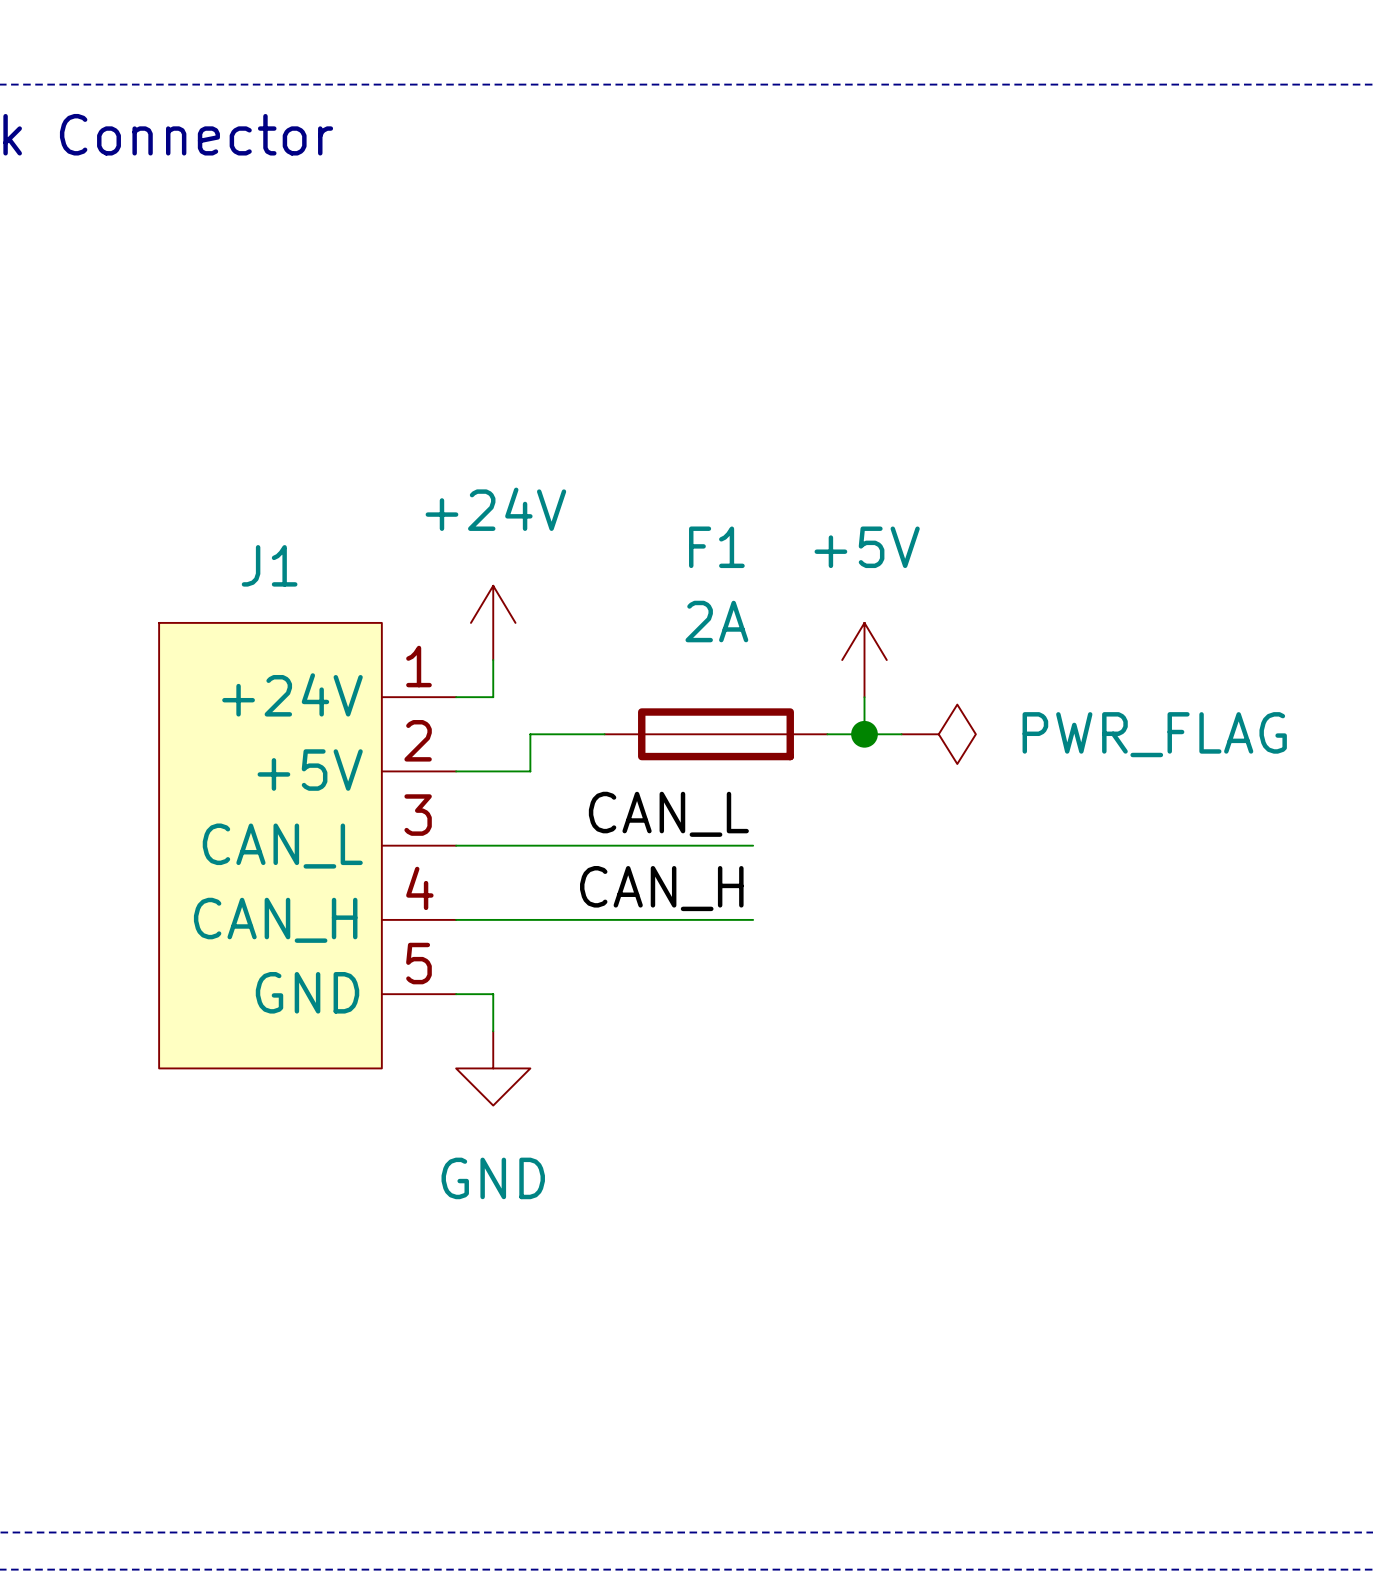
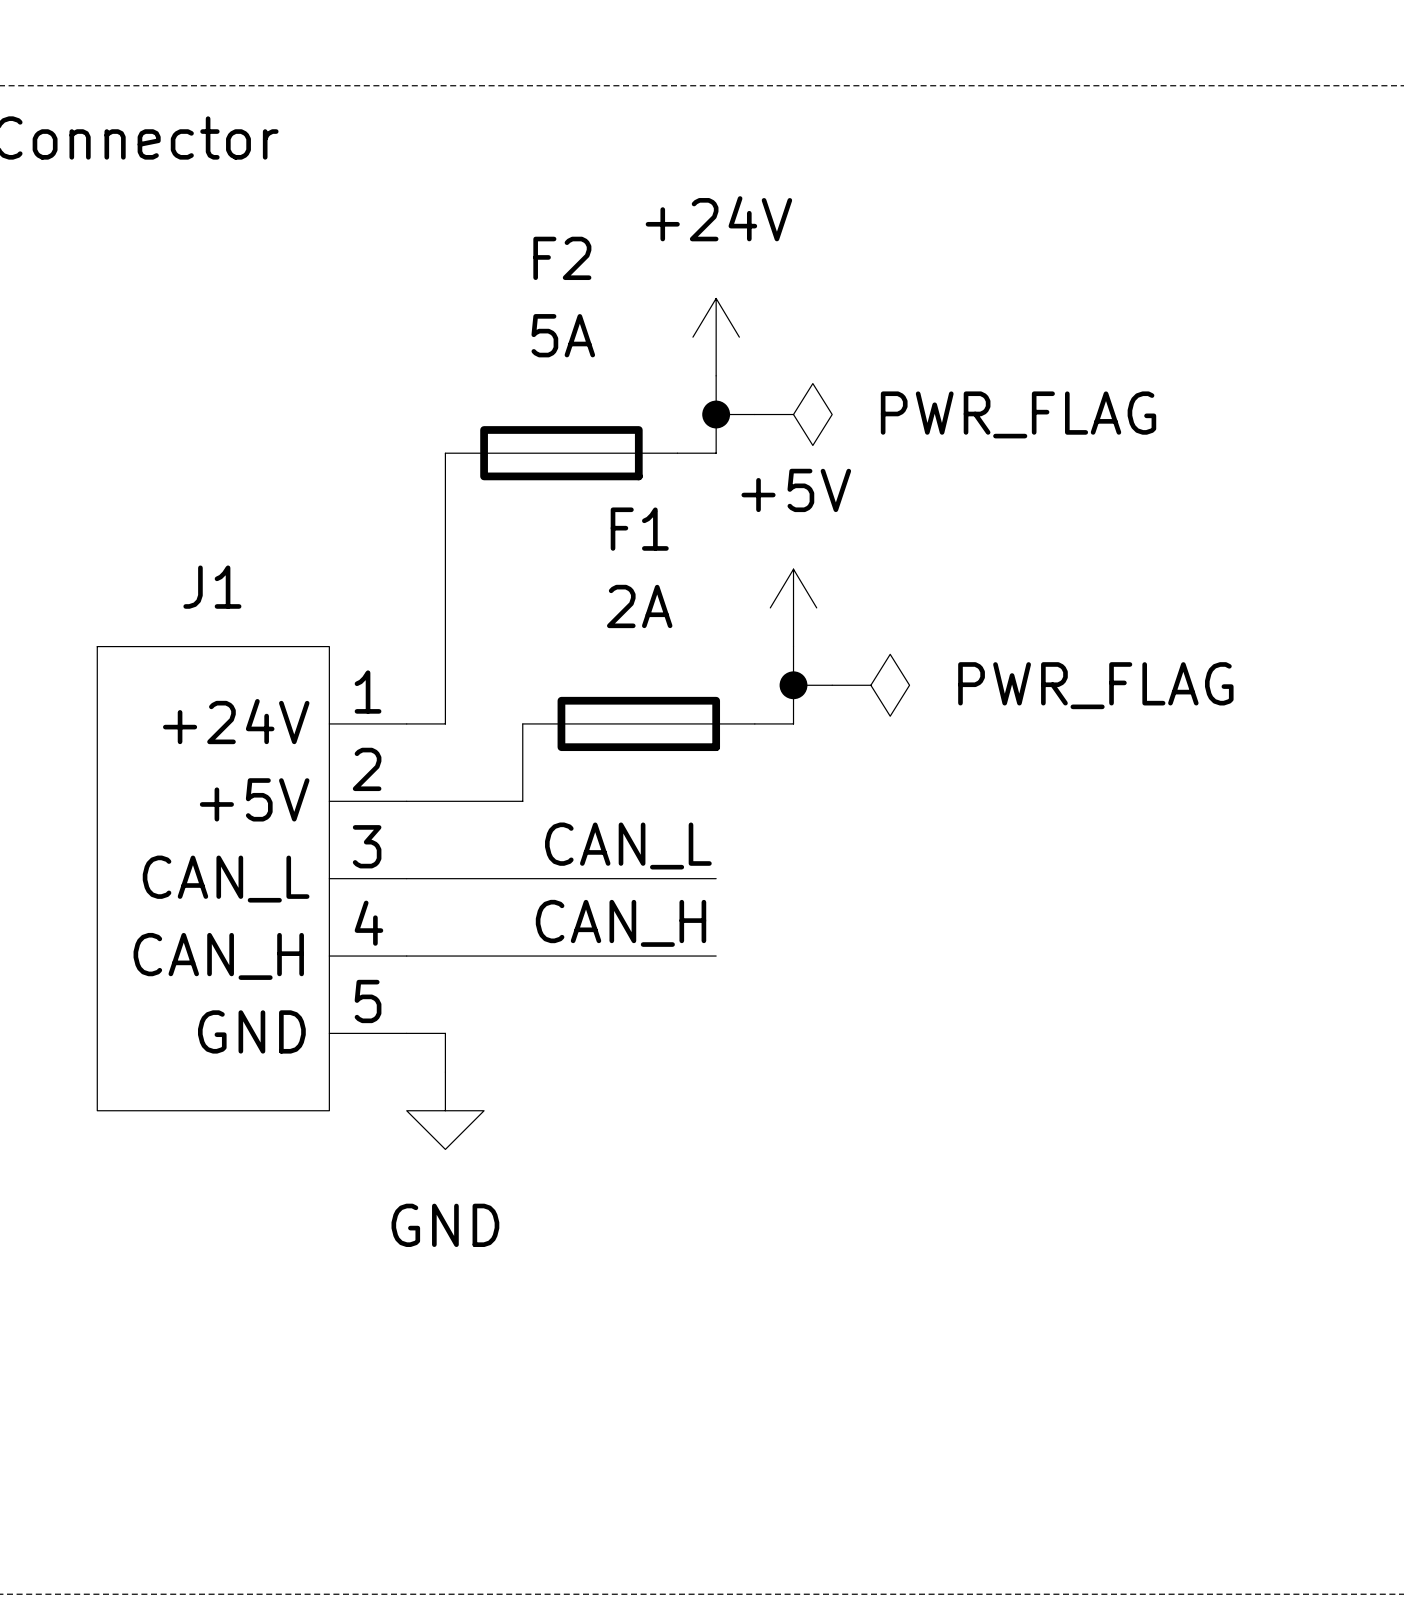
wire: none -> (716, 375) (716, 453) (677, 453)
wire: none -> (716, 414) (754, 414)
junction: none -> (716, 414)
power symbol: none -> PWR_FLAG (793, 414)
wire: none -> (445, 453) (445, 685)
F2: none -> 5A (561, 453)
power symbol position: +24V (493, 622) -> +24V (716, 337)
wire: none -> (793, 646) (793, 723) (754, 723)
wire: none -> (793, 685) (832, 685)
power symbol position: +5V (864, 660) -> +5V (793, 607)
wire: (864, 697) (864, 734) -> none
wire: (604, 734) (530, 734) (530, 771) -> (522, 723) (522, 801) (484, 801)
F1 position: (716, 734) -> (638, 723)
wire: (827, 734) (901, 734) -> none
junction position: (864, 734) -> (793, 685)
power symbol position: PWR_FLAG (938, 734) -> PWR_FLAG (870, 685)

